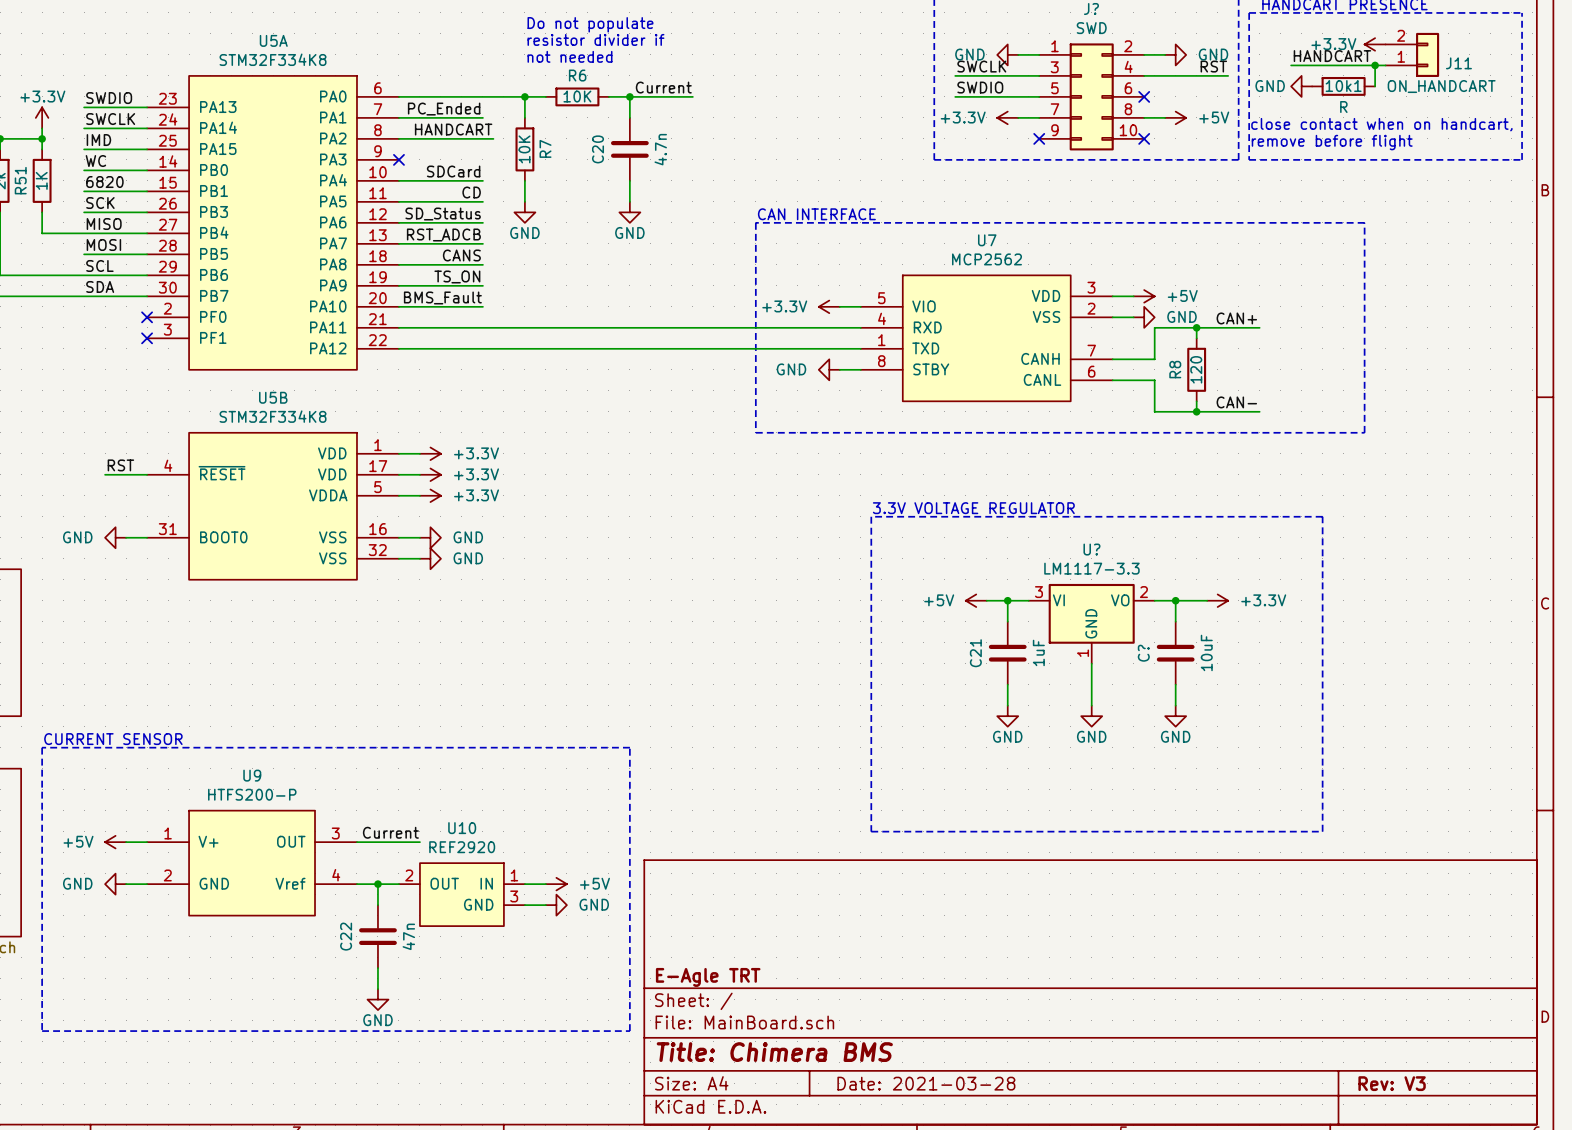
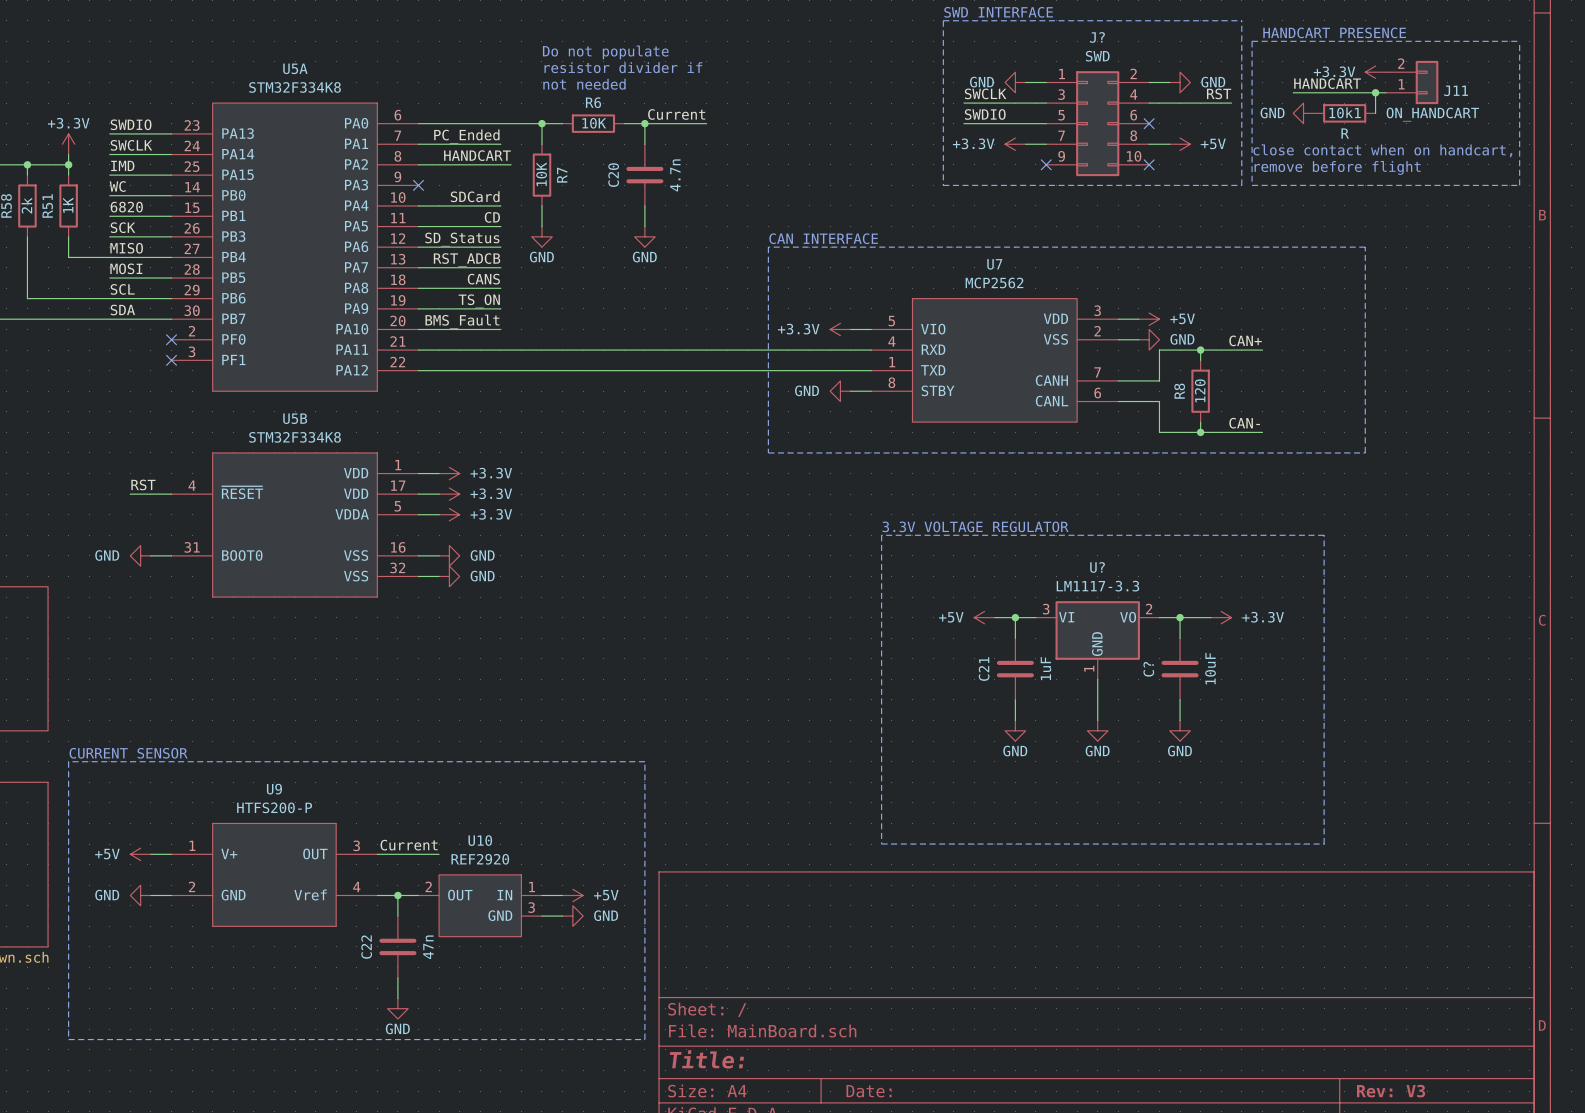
title block: E-Agle TRT (708, 977) -> none
title block: Title: Chimera BMS (774, 1052) -> Title: (706, 1059)
title block: Date: 2021-03-28 (926, 1083) -> Date: (869, 1091)

